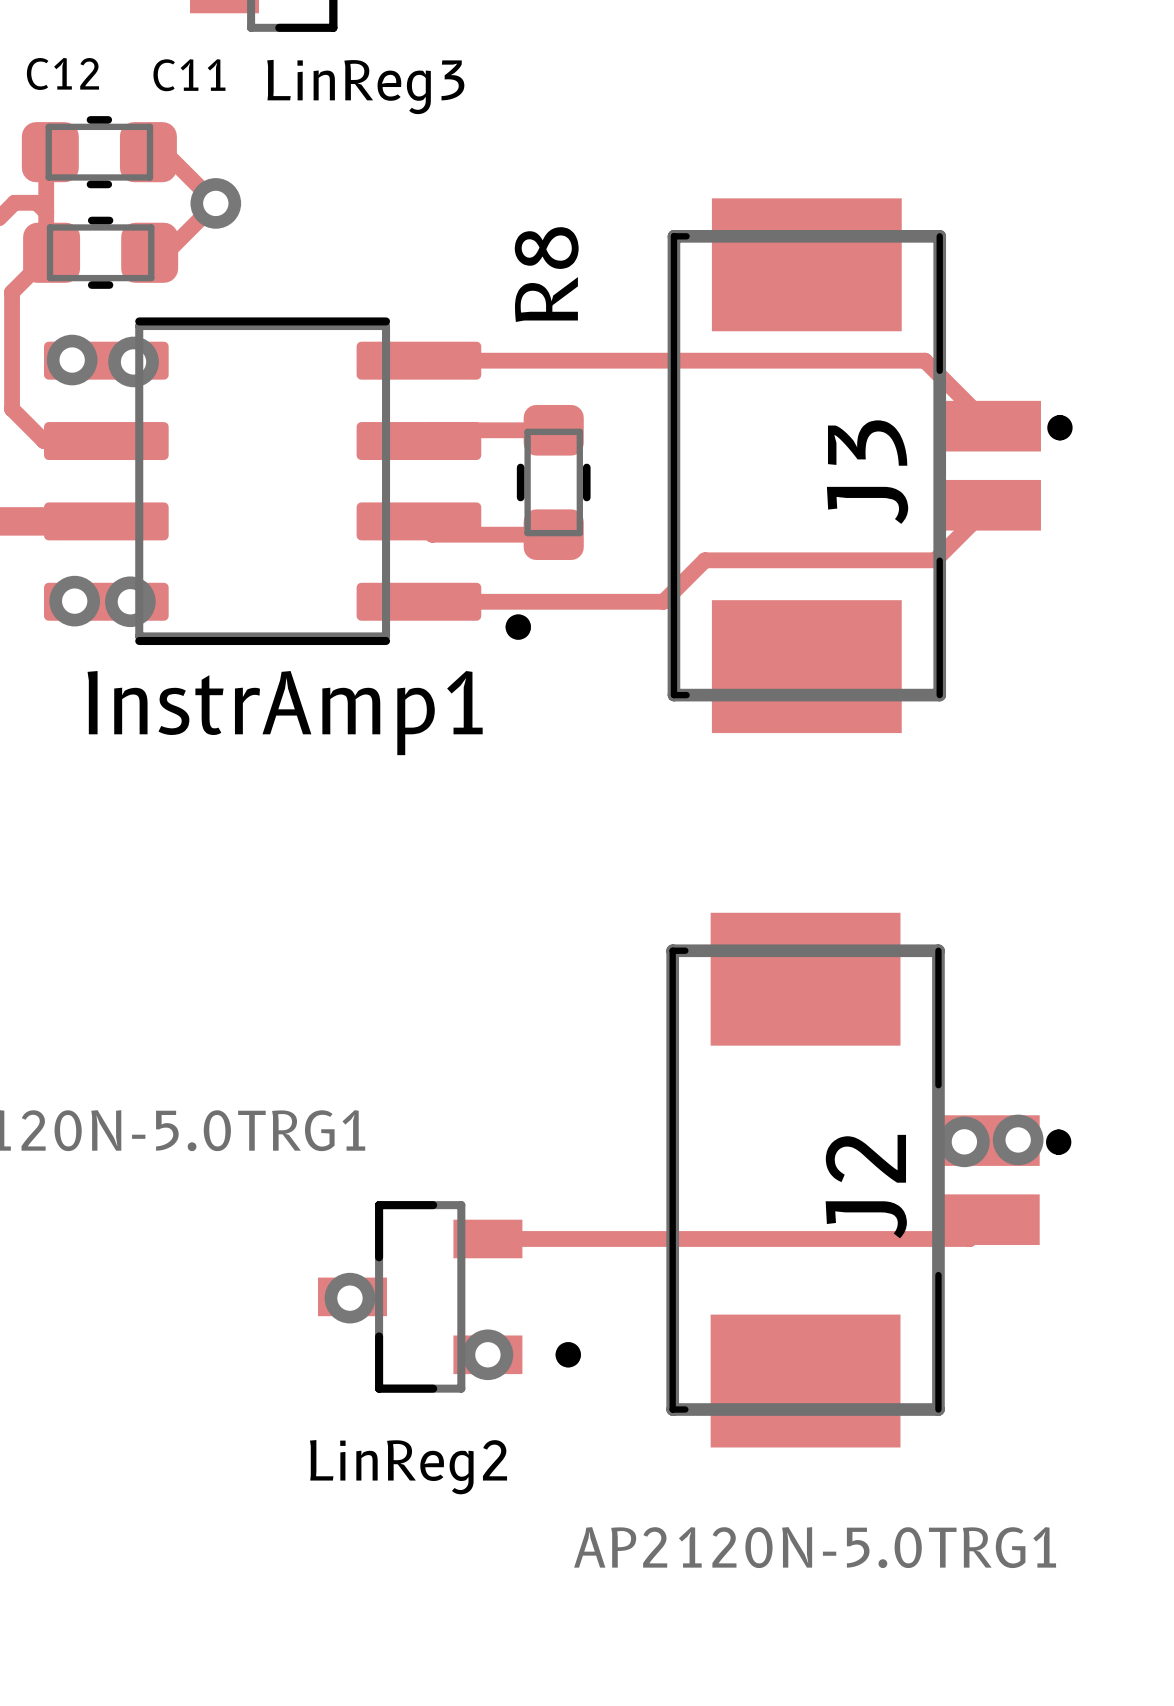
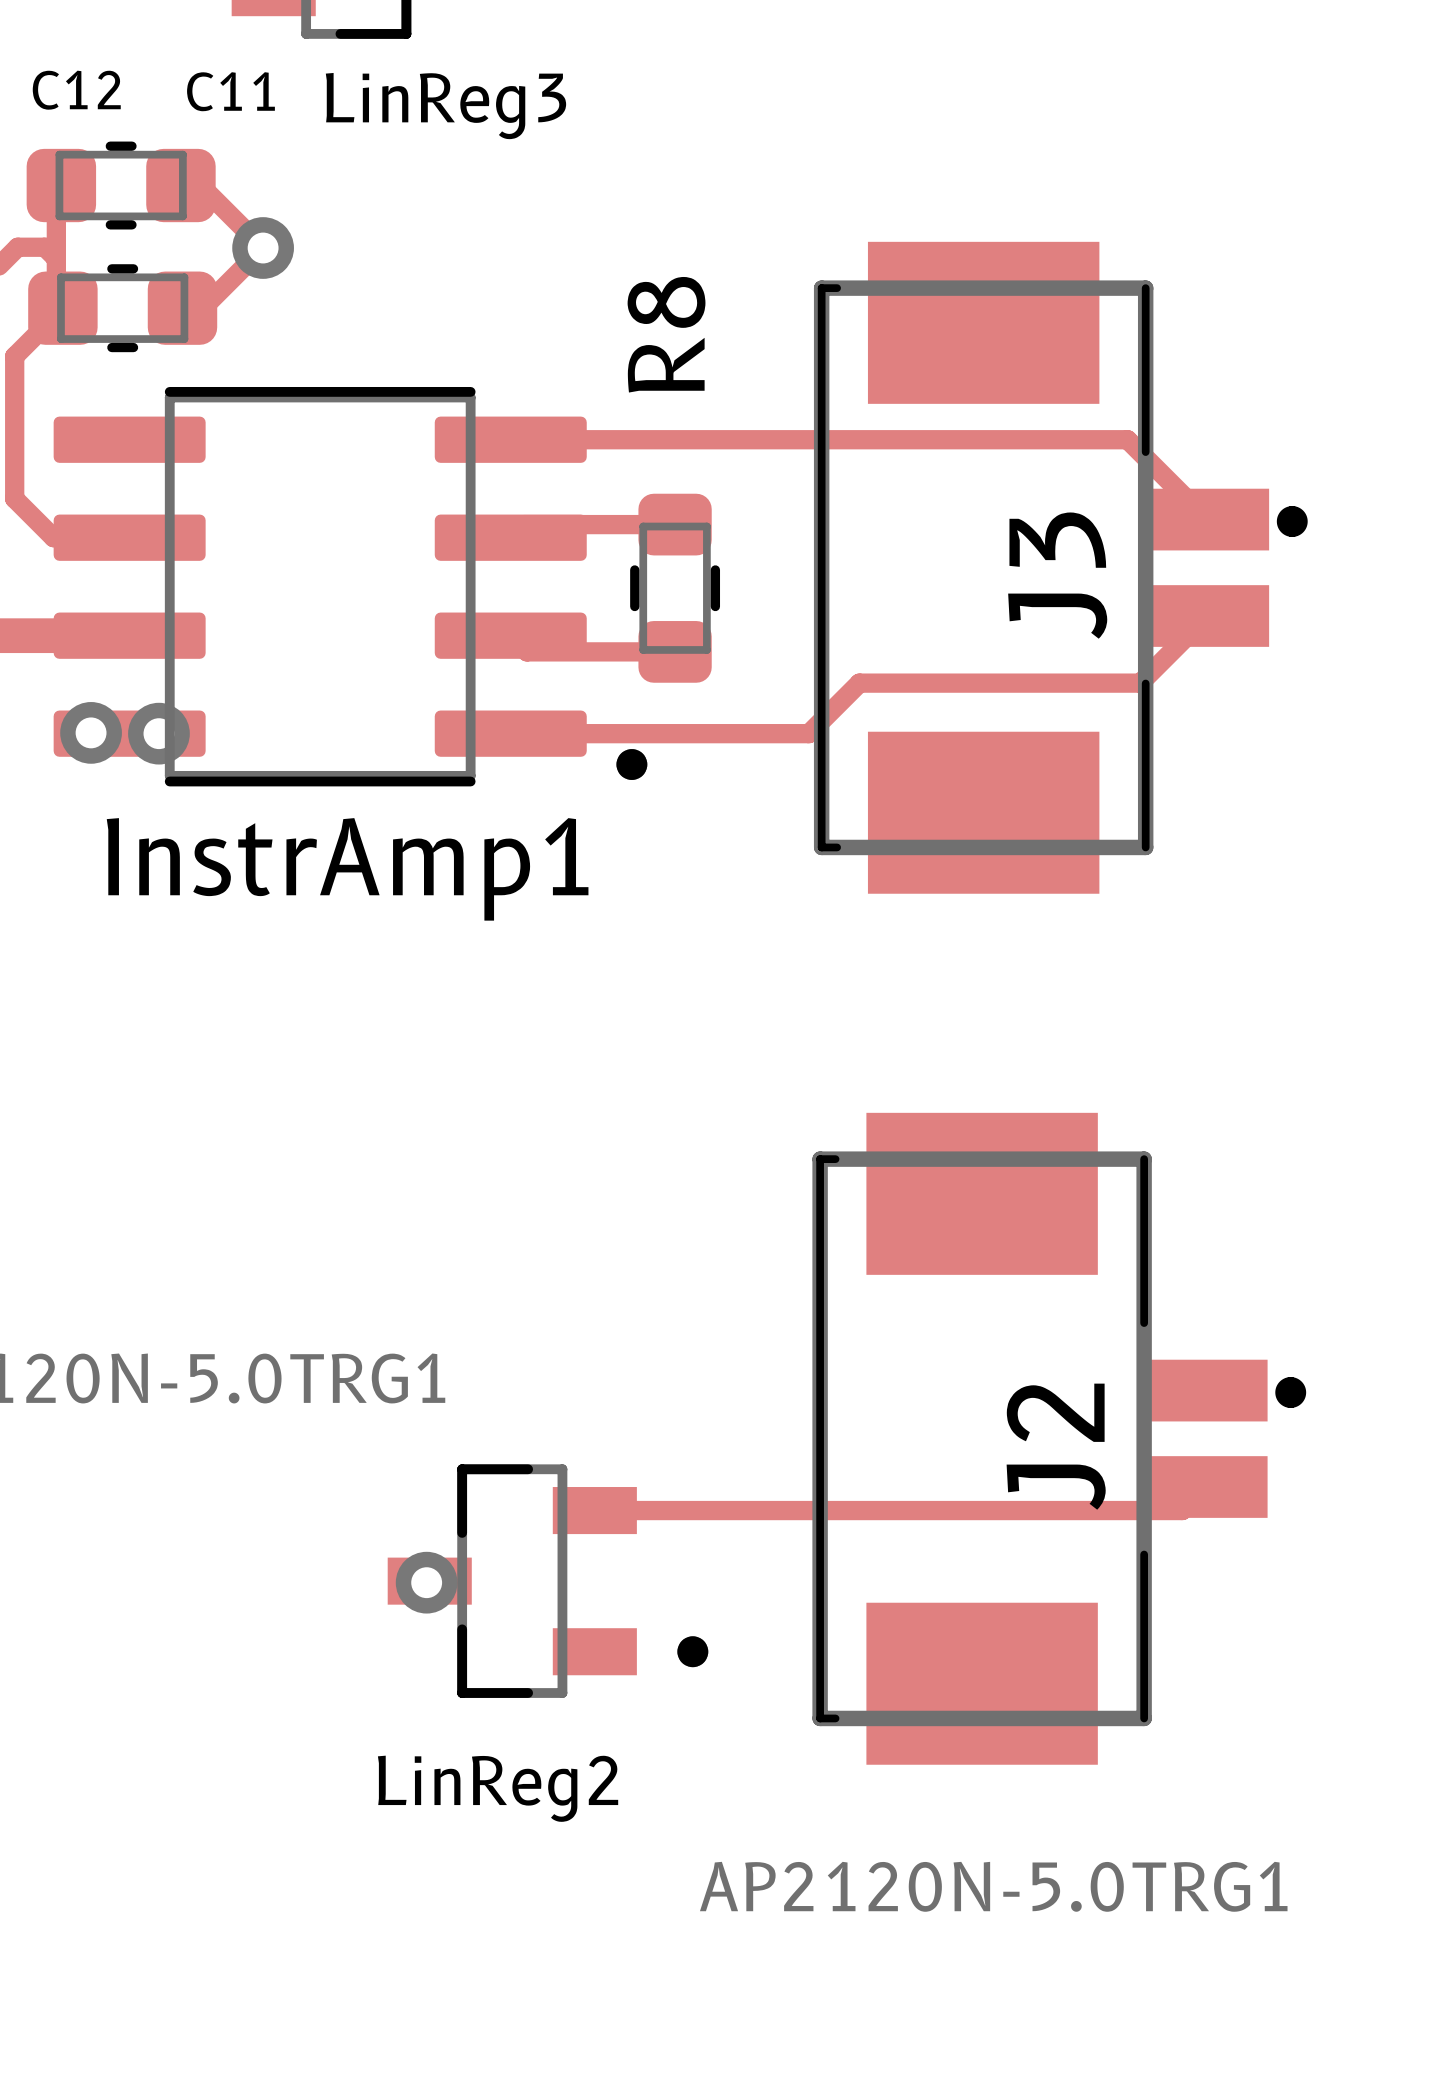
via: (72, 360) -> none
via: (133, 361) -> none
via: (1018, 1139) -> none
via: (964, 1141) -> none
via: (487, 1354) -> none

